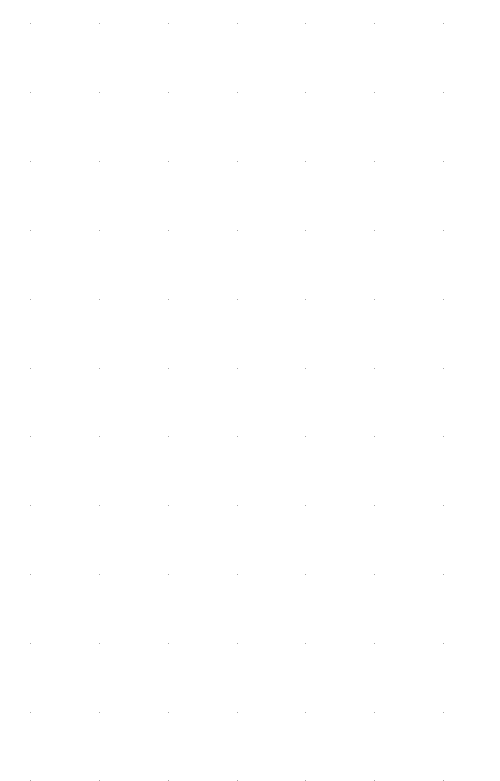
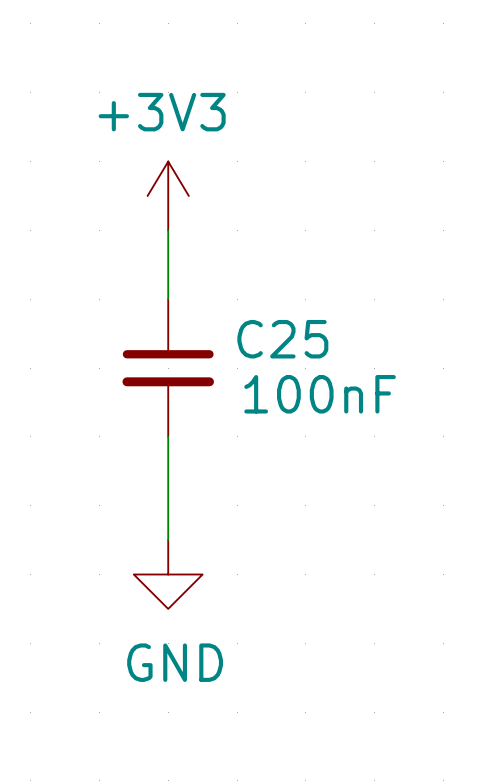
power symbol: none -> +3V3 (168, 195)
wire: none -> (168, 230) (168, 299)
C25: none -> 100nF (168, 368)
wire: none -> (168, 436) (168, 540)
power symbol: none -> GND (168, 574)

